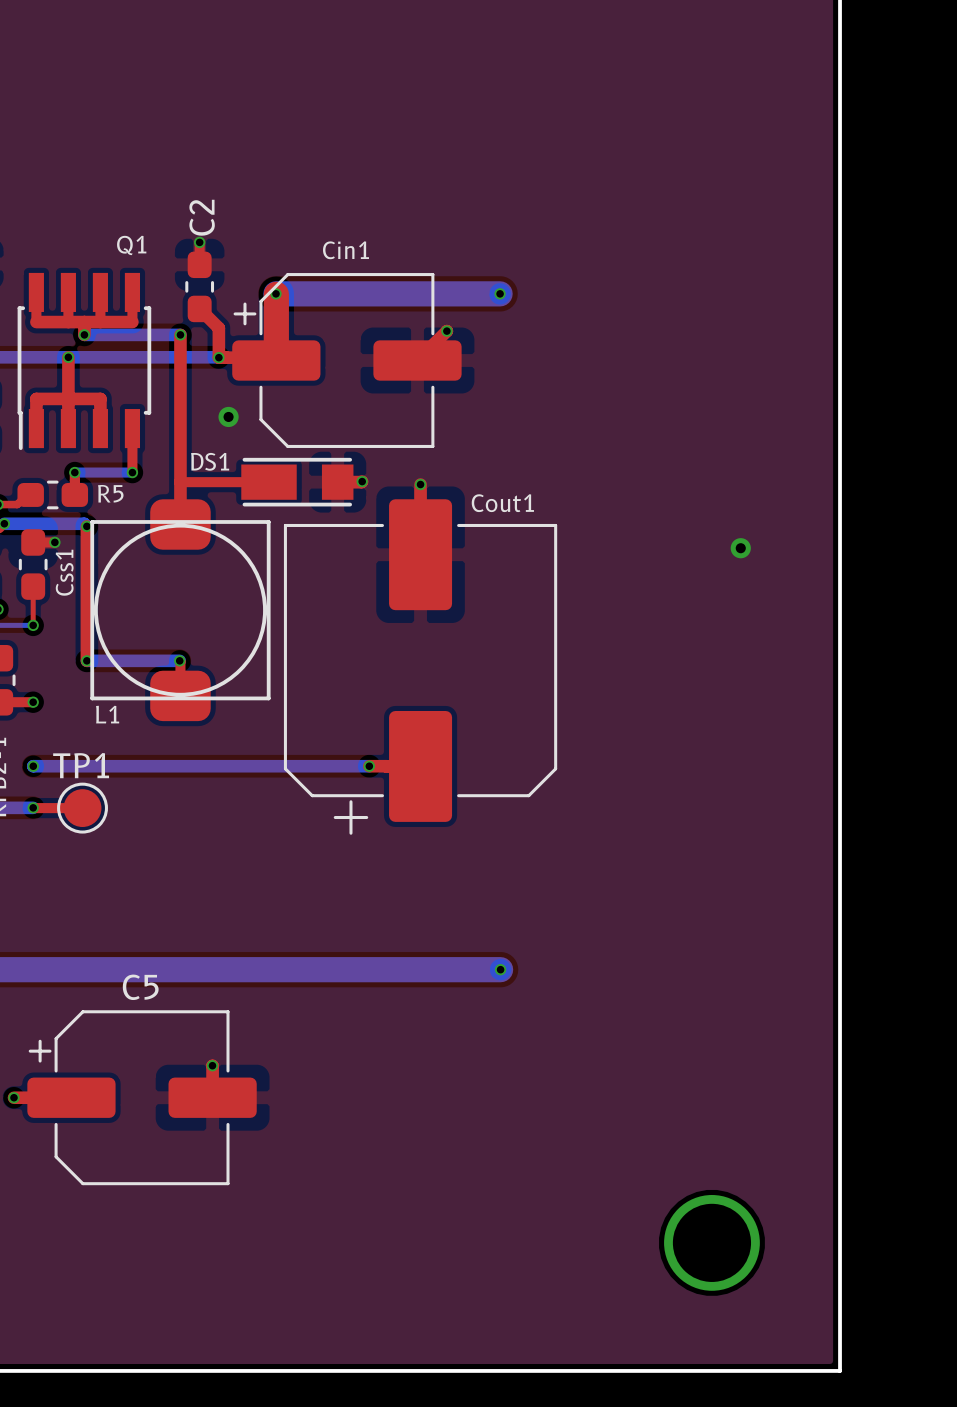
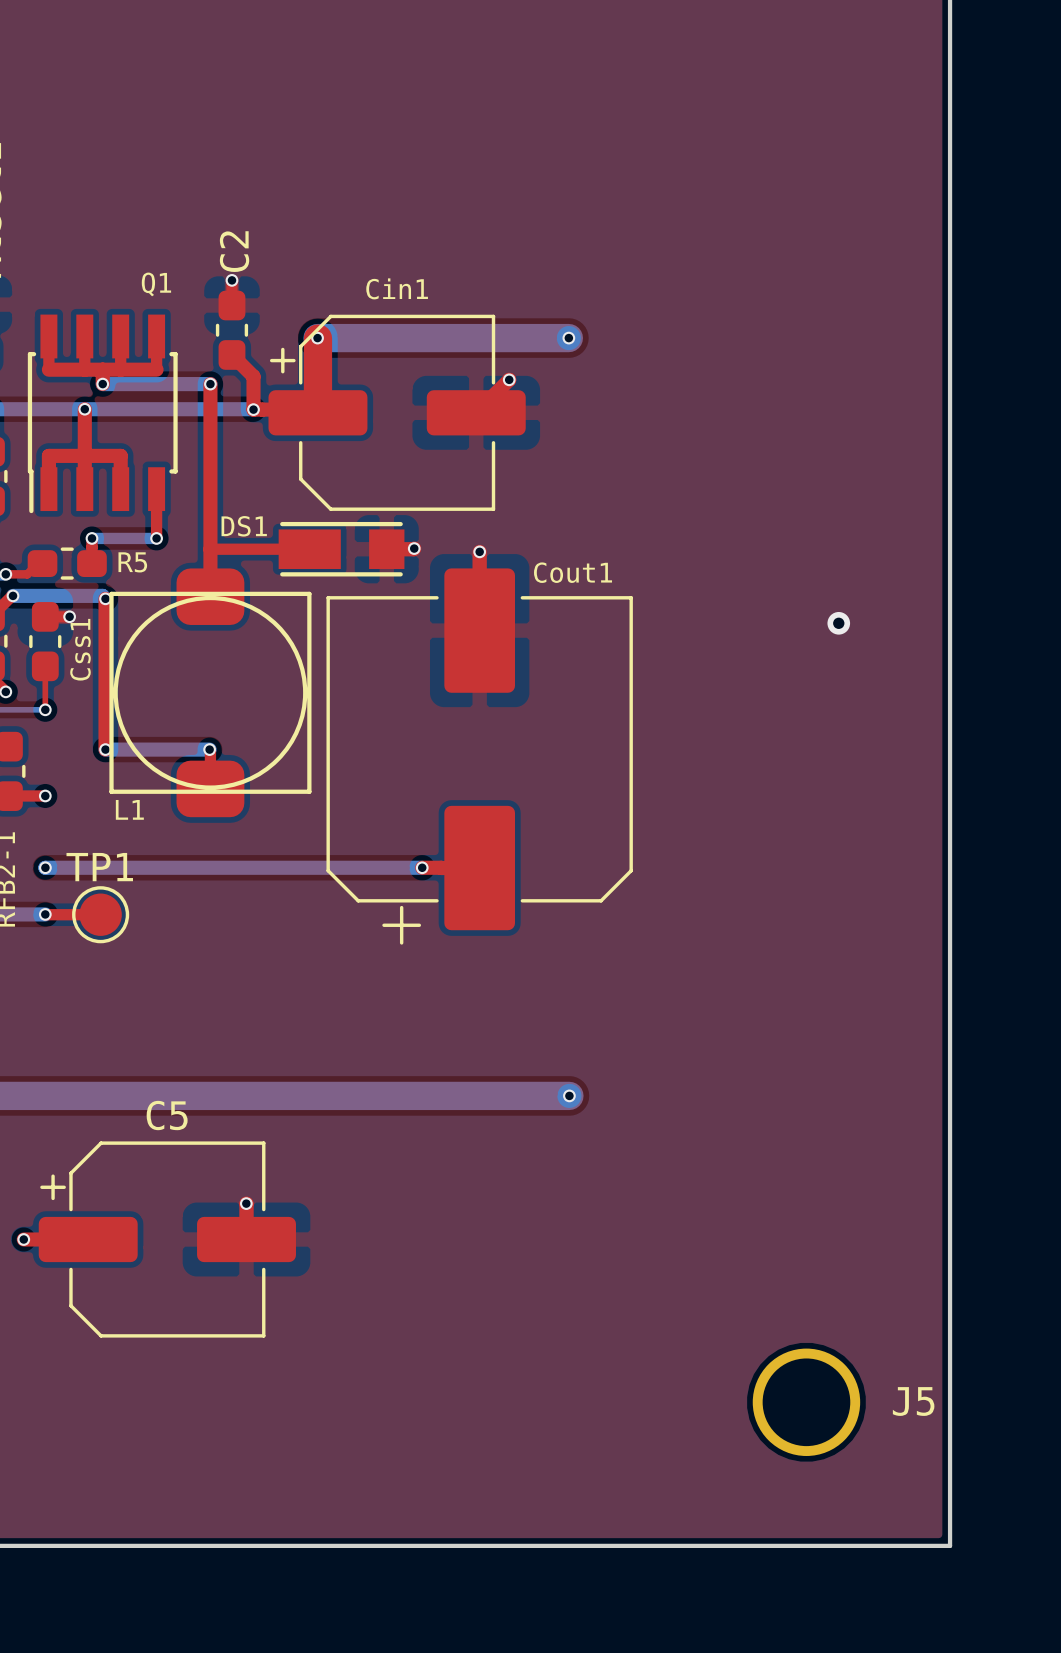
via: (228, 416) -> none
J5 name: none -> J5 (913, 1401)

